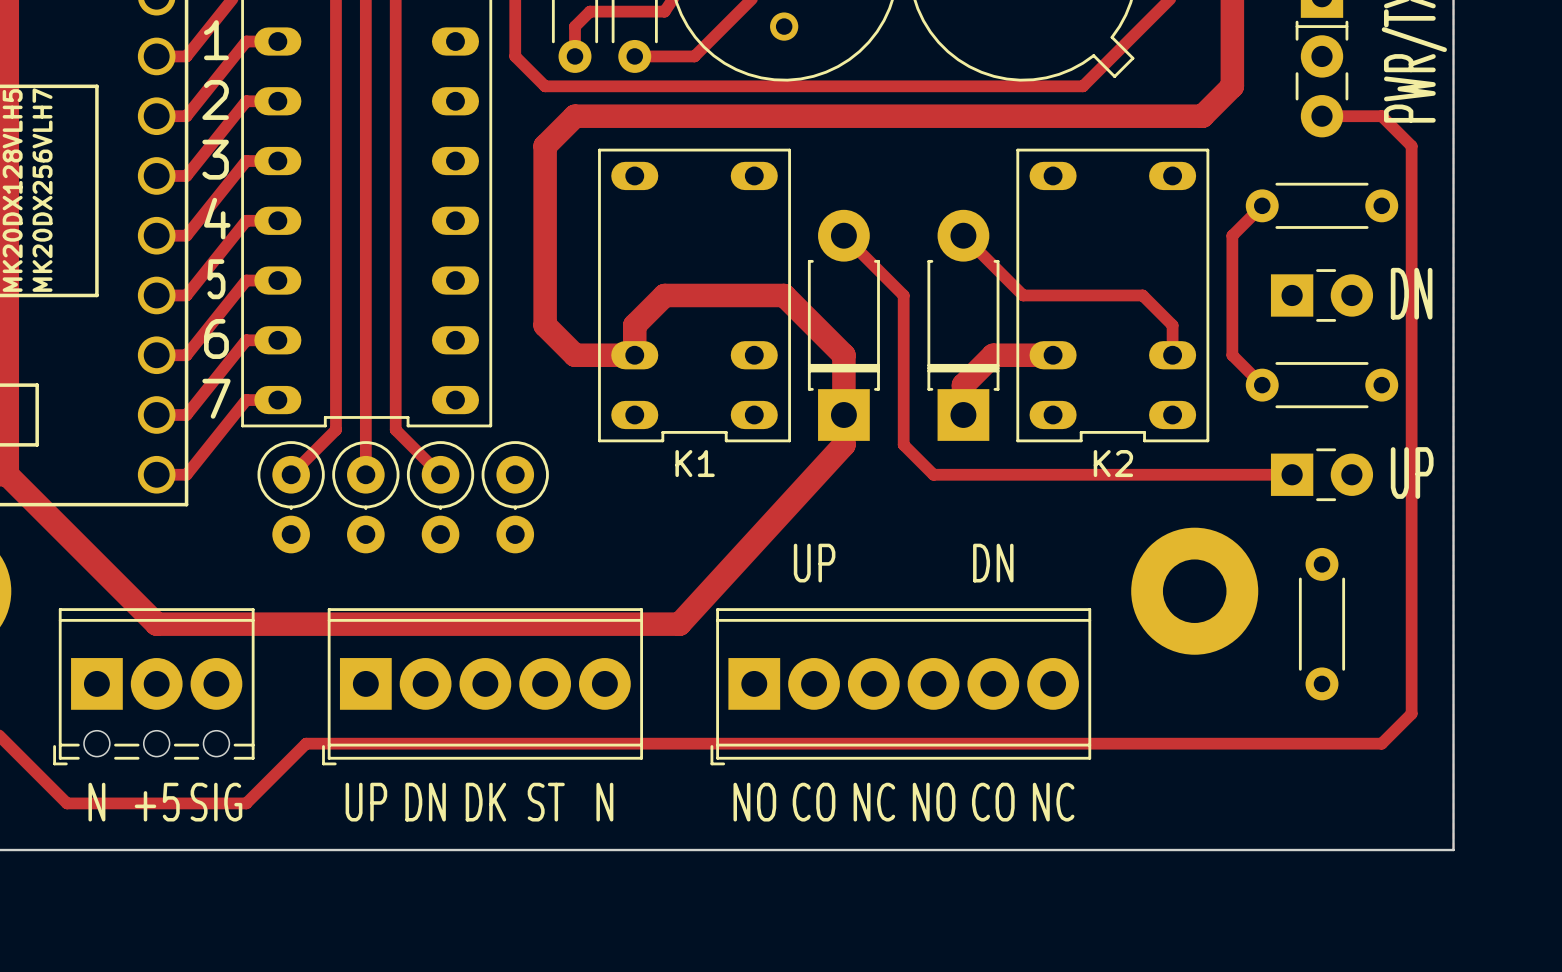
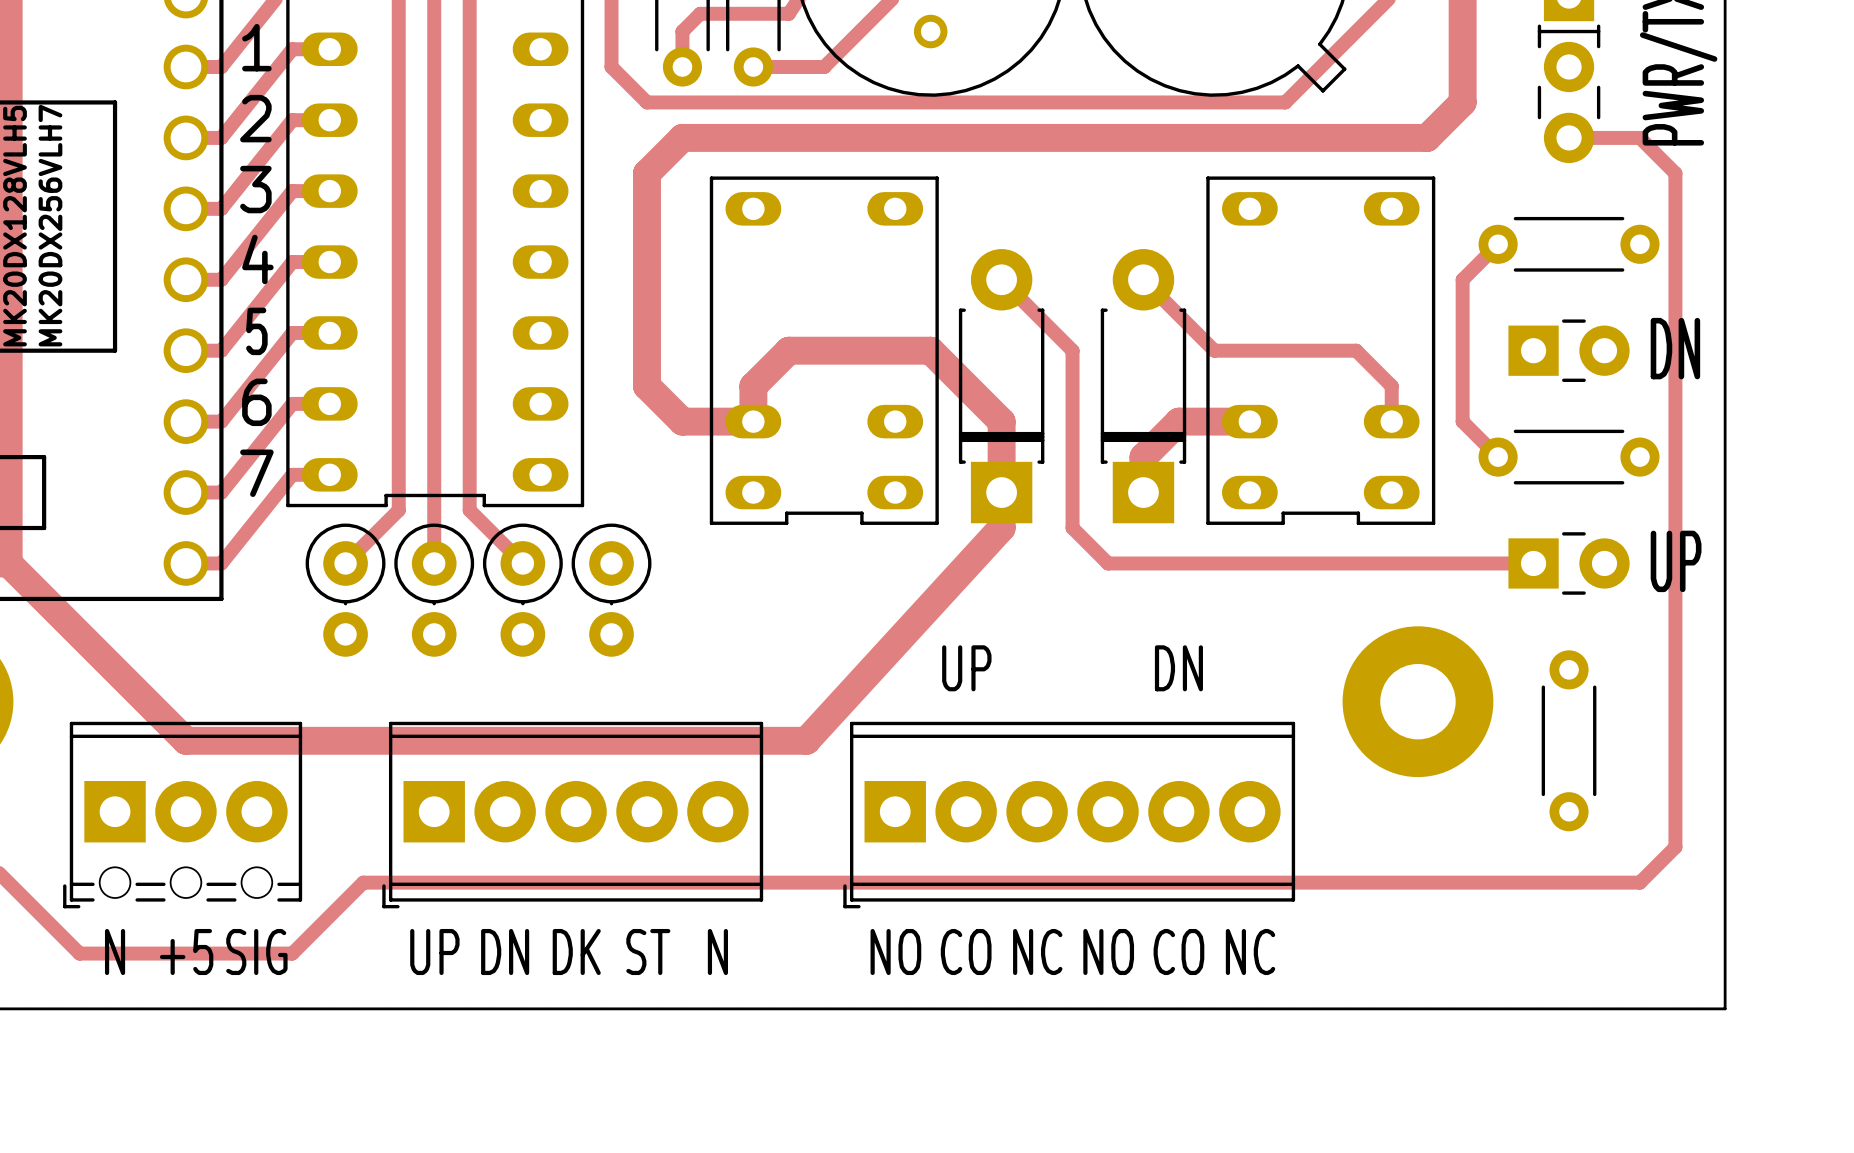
K1 name: K1 (695, 463) -> none
K2 name: K2 (1113, 463) -> none

